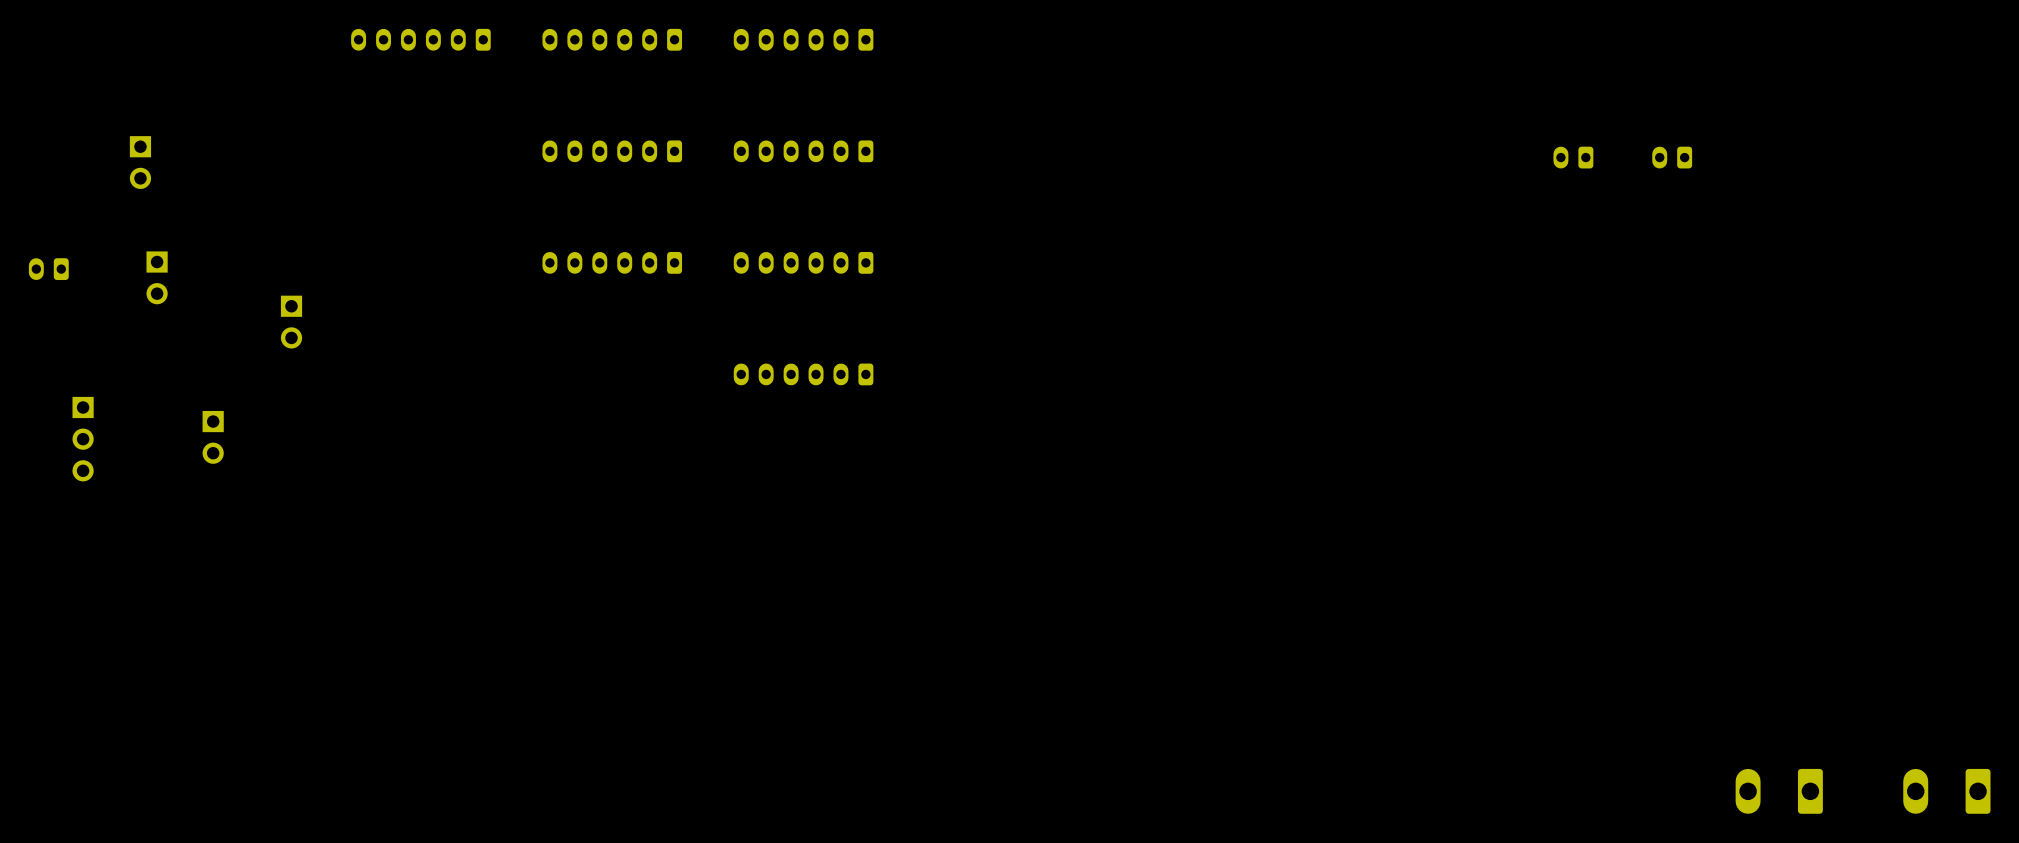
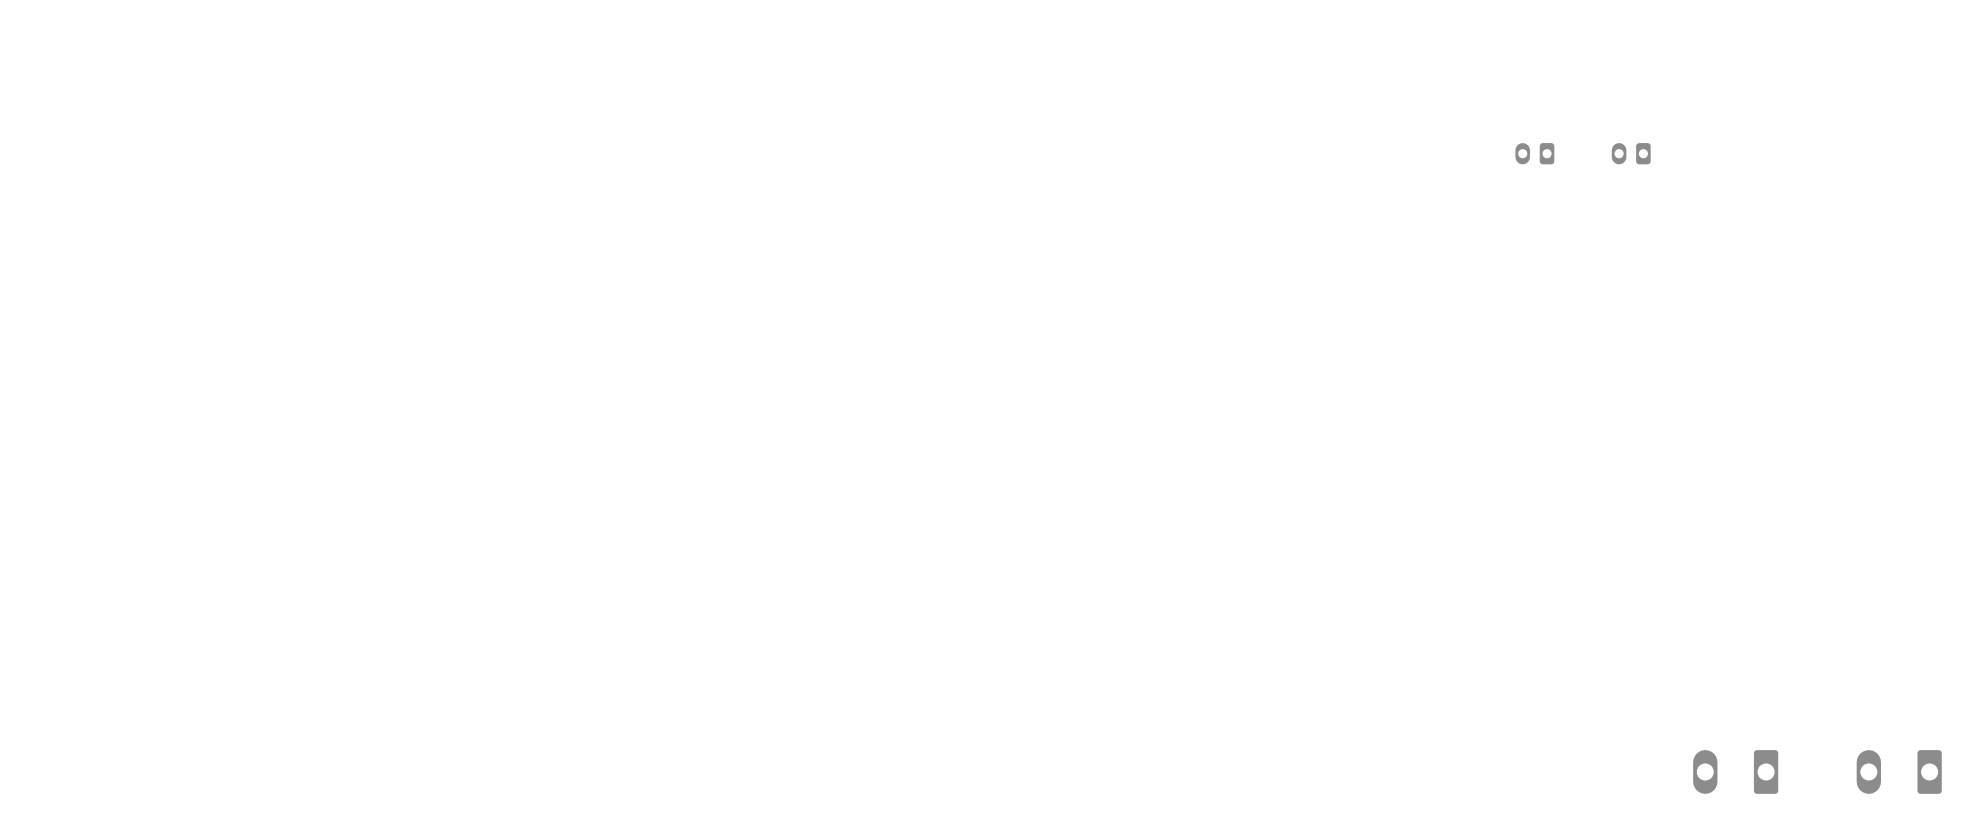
part: (420, 39) -> none
part: (612, 39) -> none
part: (803, 39) -> none
part: (612, 151) -> none
part: (803, 151) -> none
part: (140, 162) -> none
part: (612, 262) -> none
part: (803, 262) -> none
part: (48, 269) -> none
part: (157, 277) -> none
part: (291, 322) -> none
part: (803, 374) -> none
part: (213, 437) -> none
part: (83, 439) -> none

